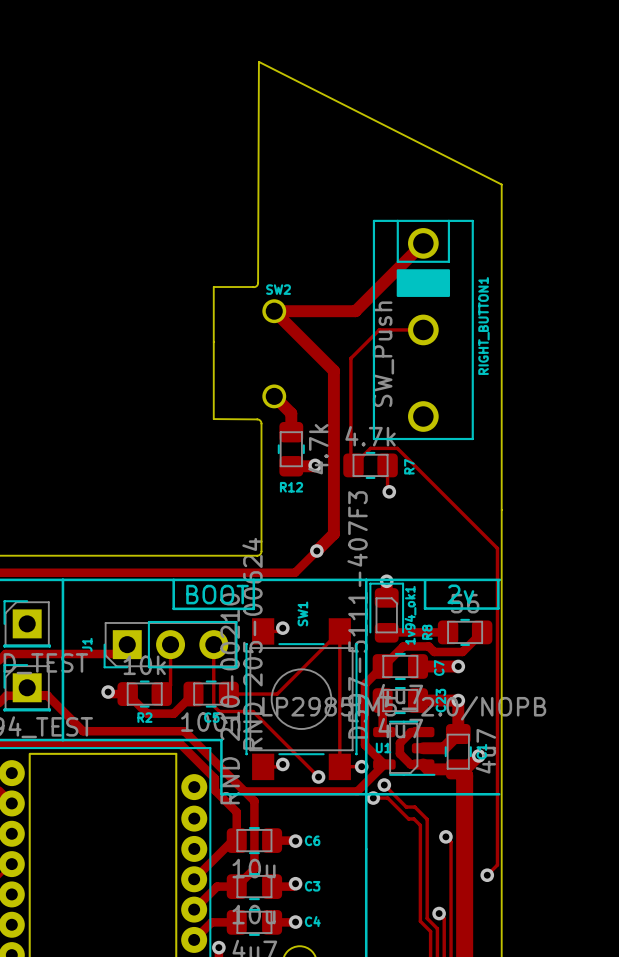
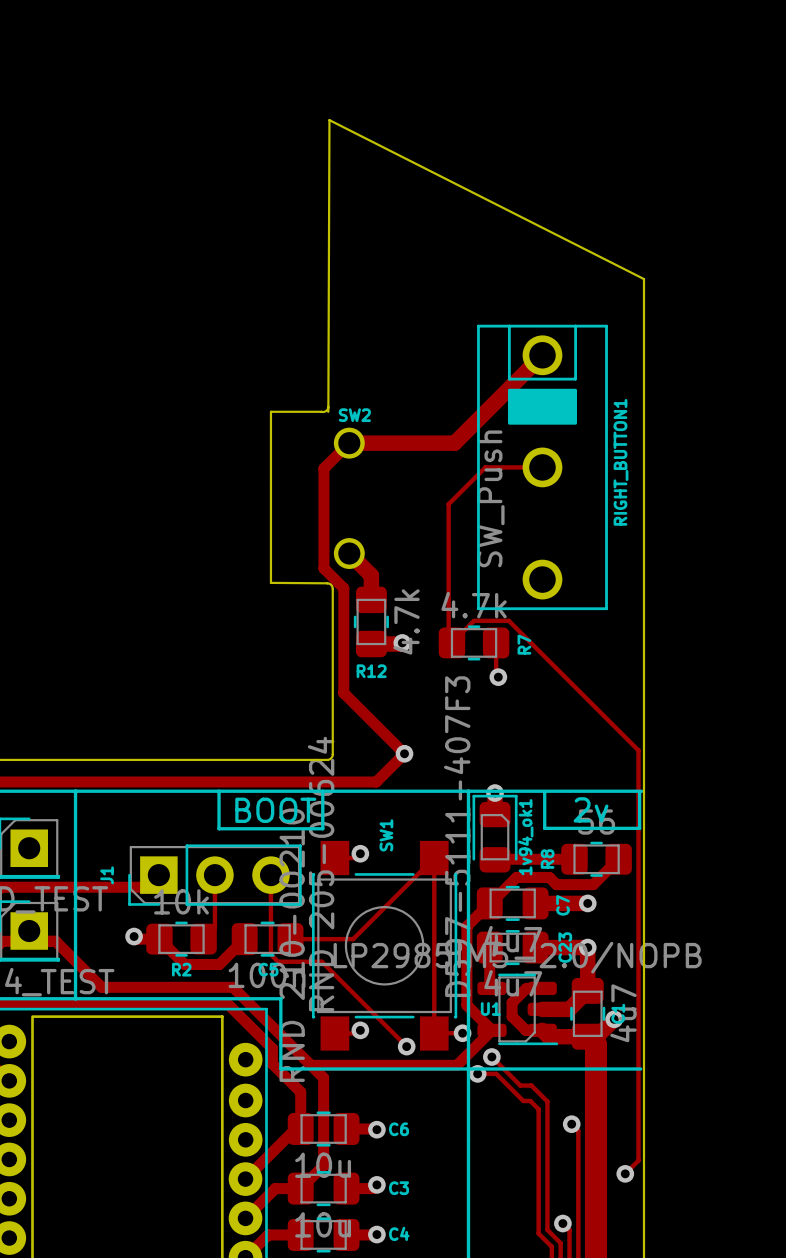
track: (274, 311) (333, 370) (333, 533) (316, 550) -> (349, 443) (323, 468) (323, 568) (343, 588) (343, 693) (404, 753)

